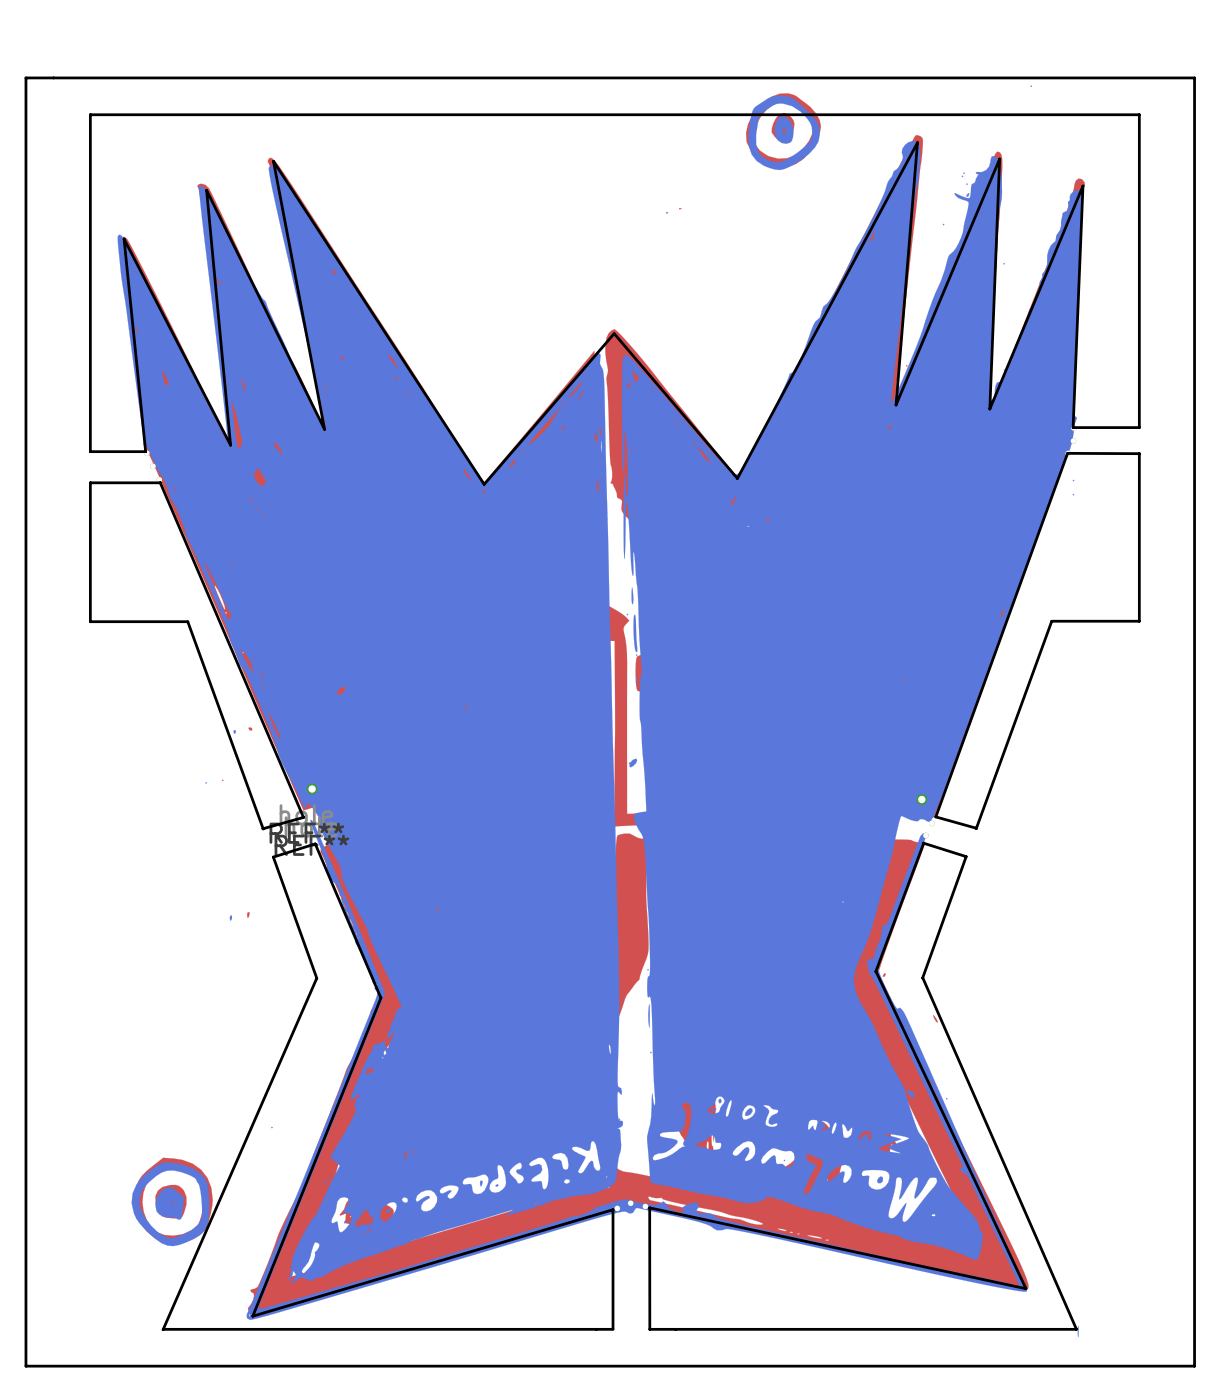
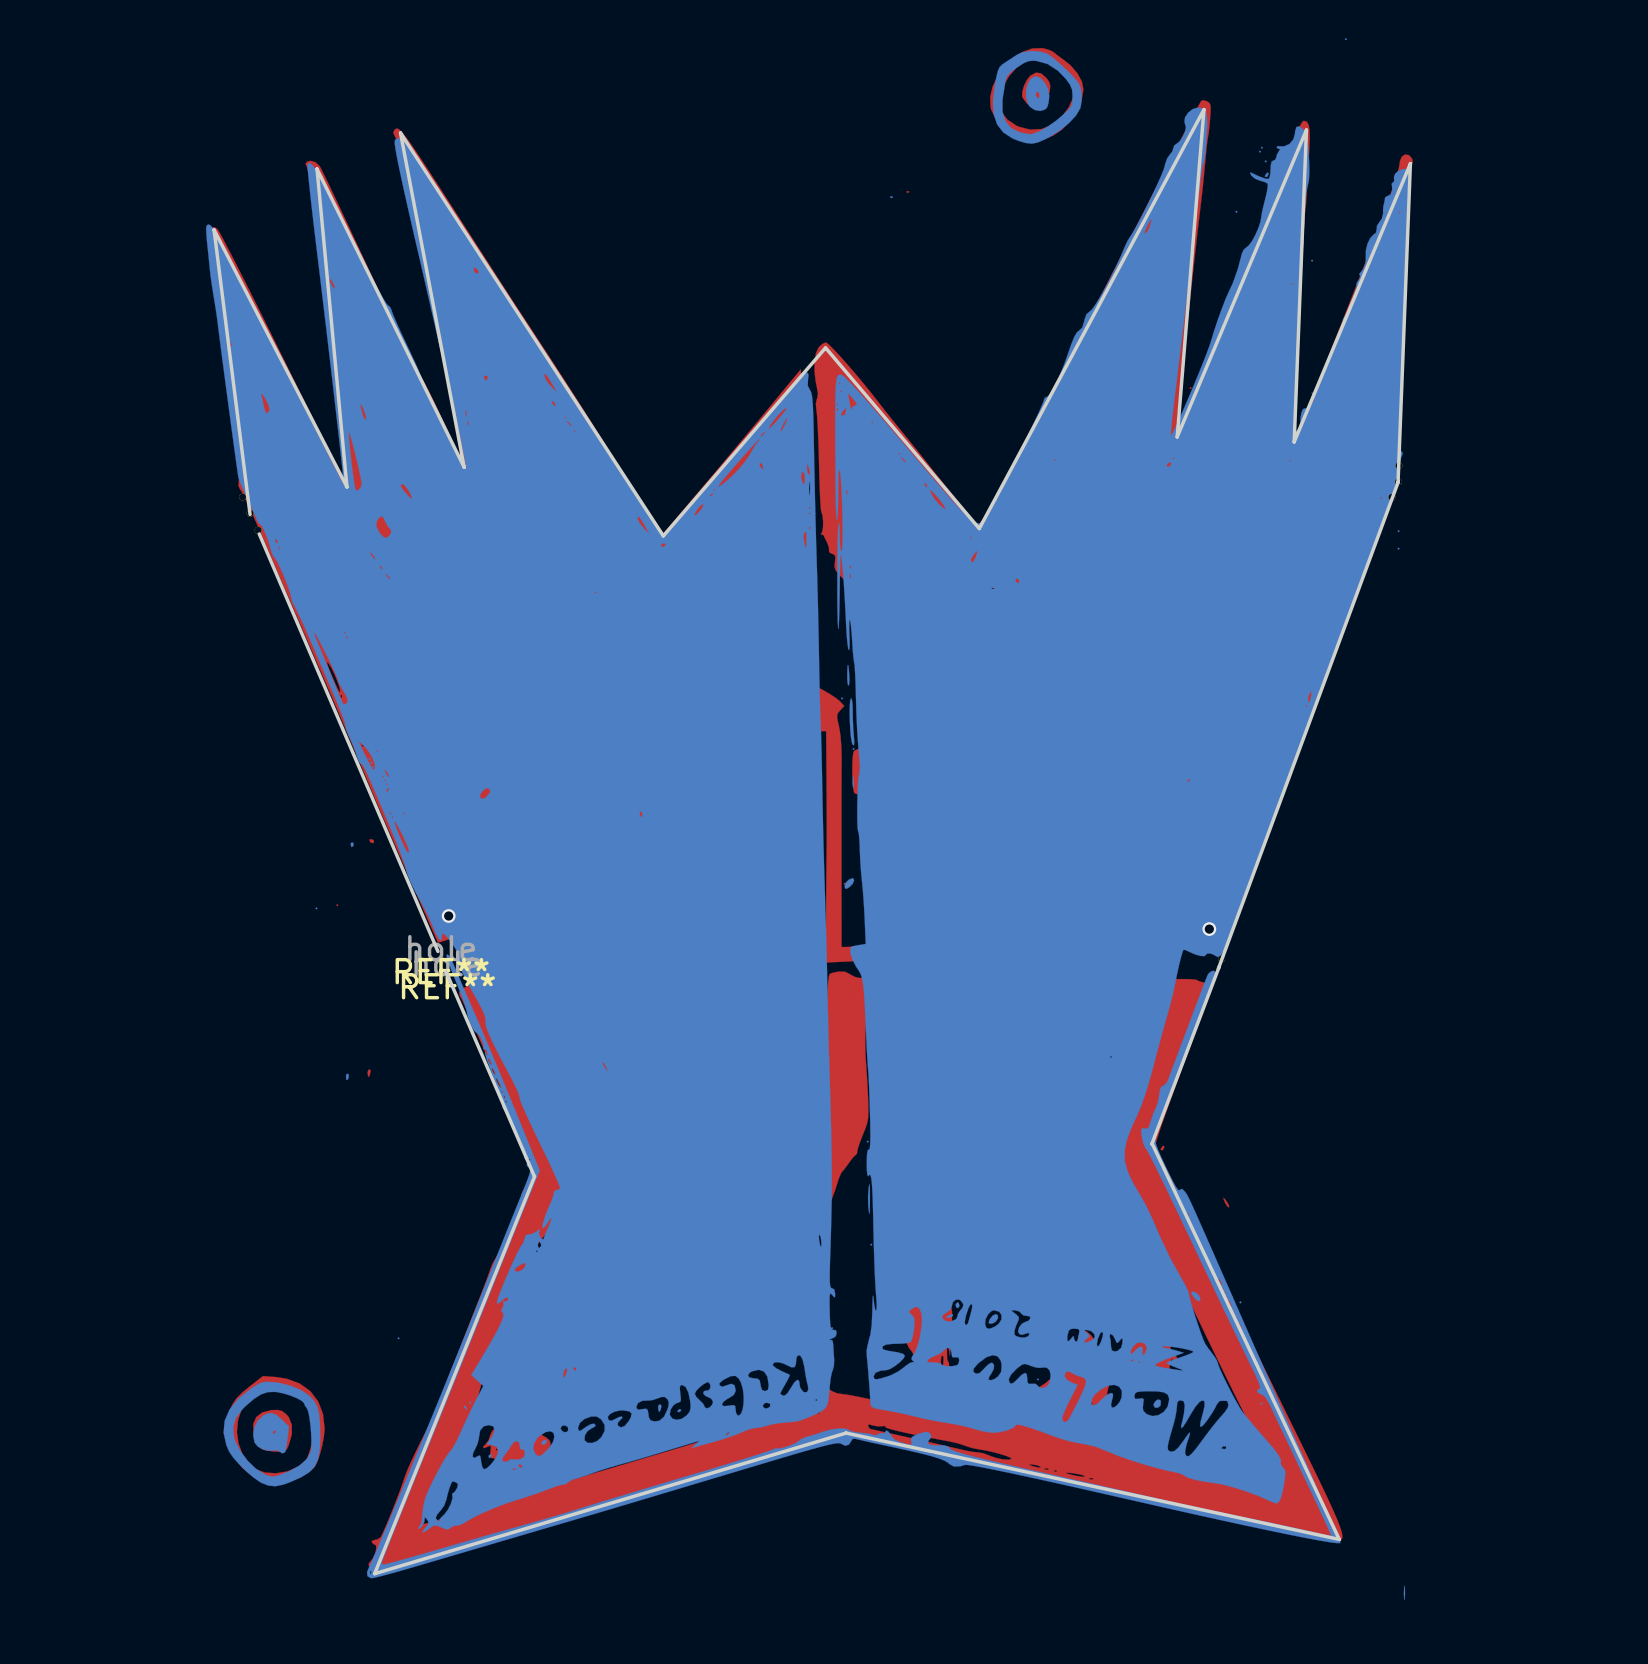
board edge: (1194, 77) (25, 77) (25, 1366) (1194, 1366) (1194, 77) -> none
board edge: (1082, 186) (1073, 427) (1139, 427) (1139, 114) (90, 114) (90, 451) -> (1410, 163) (1398, 482)
board edge: (124, 239) (145, 451) -> (214, 229) (250, 514)
board edge: none -> (1398, 481) (1218, 968)
board edge: (145, 451) (90, 451) -> none
board edge: (1139, 453) (1139, 621) -> none
board edge: (1139, 453) (1067, 453) (935, 816) (976, 828) -> none
board edge: (160, 482) (90, 482) (90, 621) -> none
board edge: (187, 621) (90, 621) -> none
board edge: (187, 621) (263, 829) -> none
board edge: (1051, 621) (976, 828) -> none
board edge: (1139, 621) (1051, 621) -> none
board edge: (303, 817) (262, 828) -> none
part: (925, 835) -> none
board edge: (923, 843) (875, 971) -> (1218, 967) (1151, 1144)
board edge: (923, 843) (966, 856) (922, 978) -> none
board edge: (922, 977) (1076, 1329) -> none
board edge: (316, 978) (273, 857) (315, 843) (380, 997) -> (445, 971) (534, 1176)
board edge: (316, 978) (163, 1329) -> none
part: (630, 1203) -> none
part: (645, 1206) -> none
board edge: (649, 1207) (1026, 1288) -> (374, 1573) (846, 1433) (1339, 1539)
board edge: (649, 1207) (649, 1329) (1076, 1329) -> none
part: (617, 1208) -> none
board edge: (252, 1316) (613, 1209) (613, 1328) -> none
board edge: (613, 1329) (163, 1329) -> none

